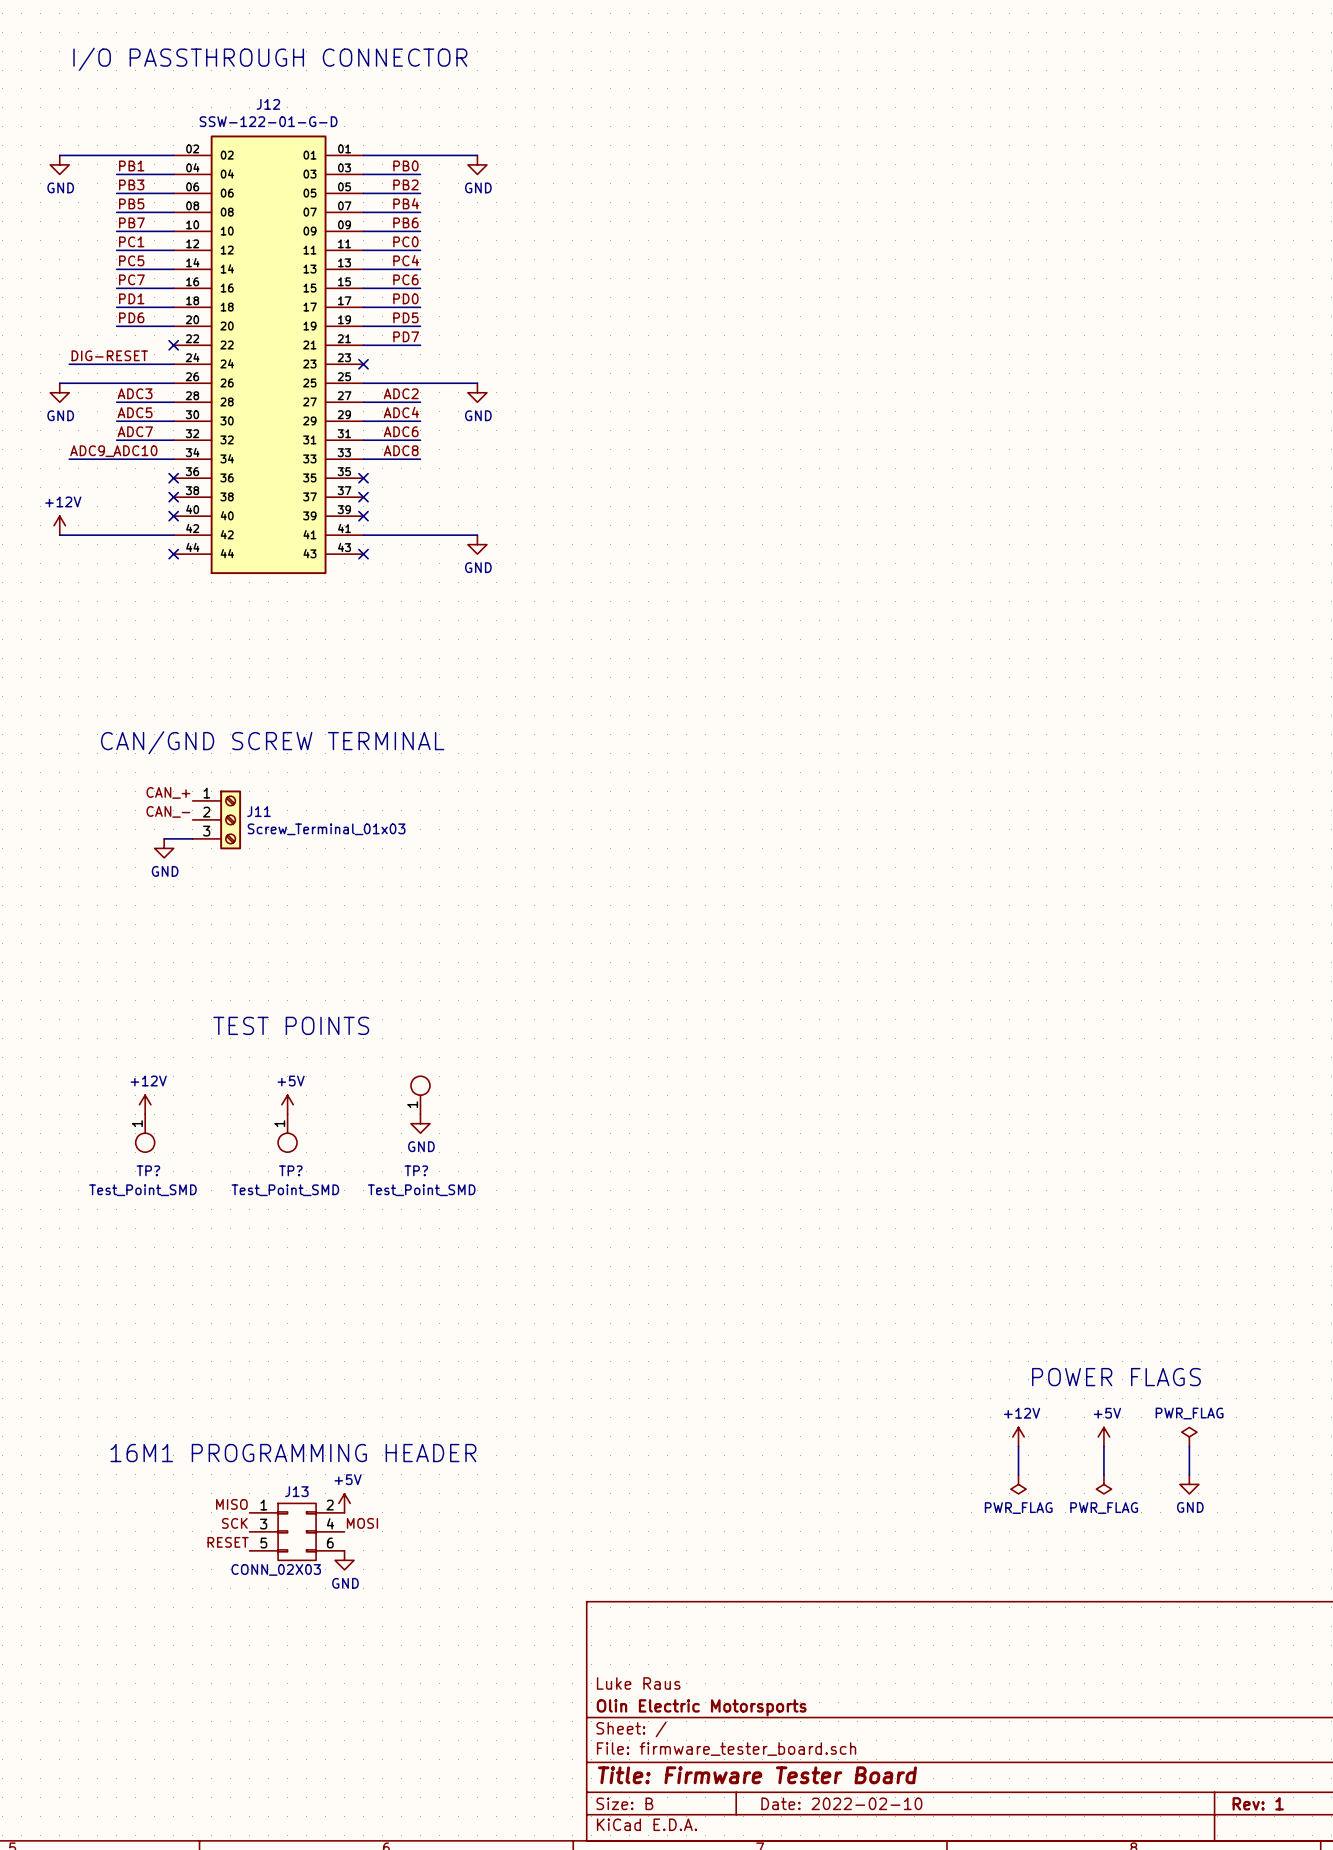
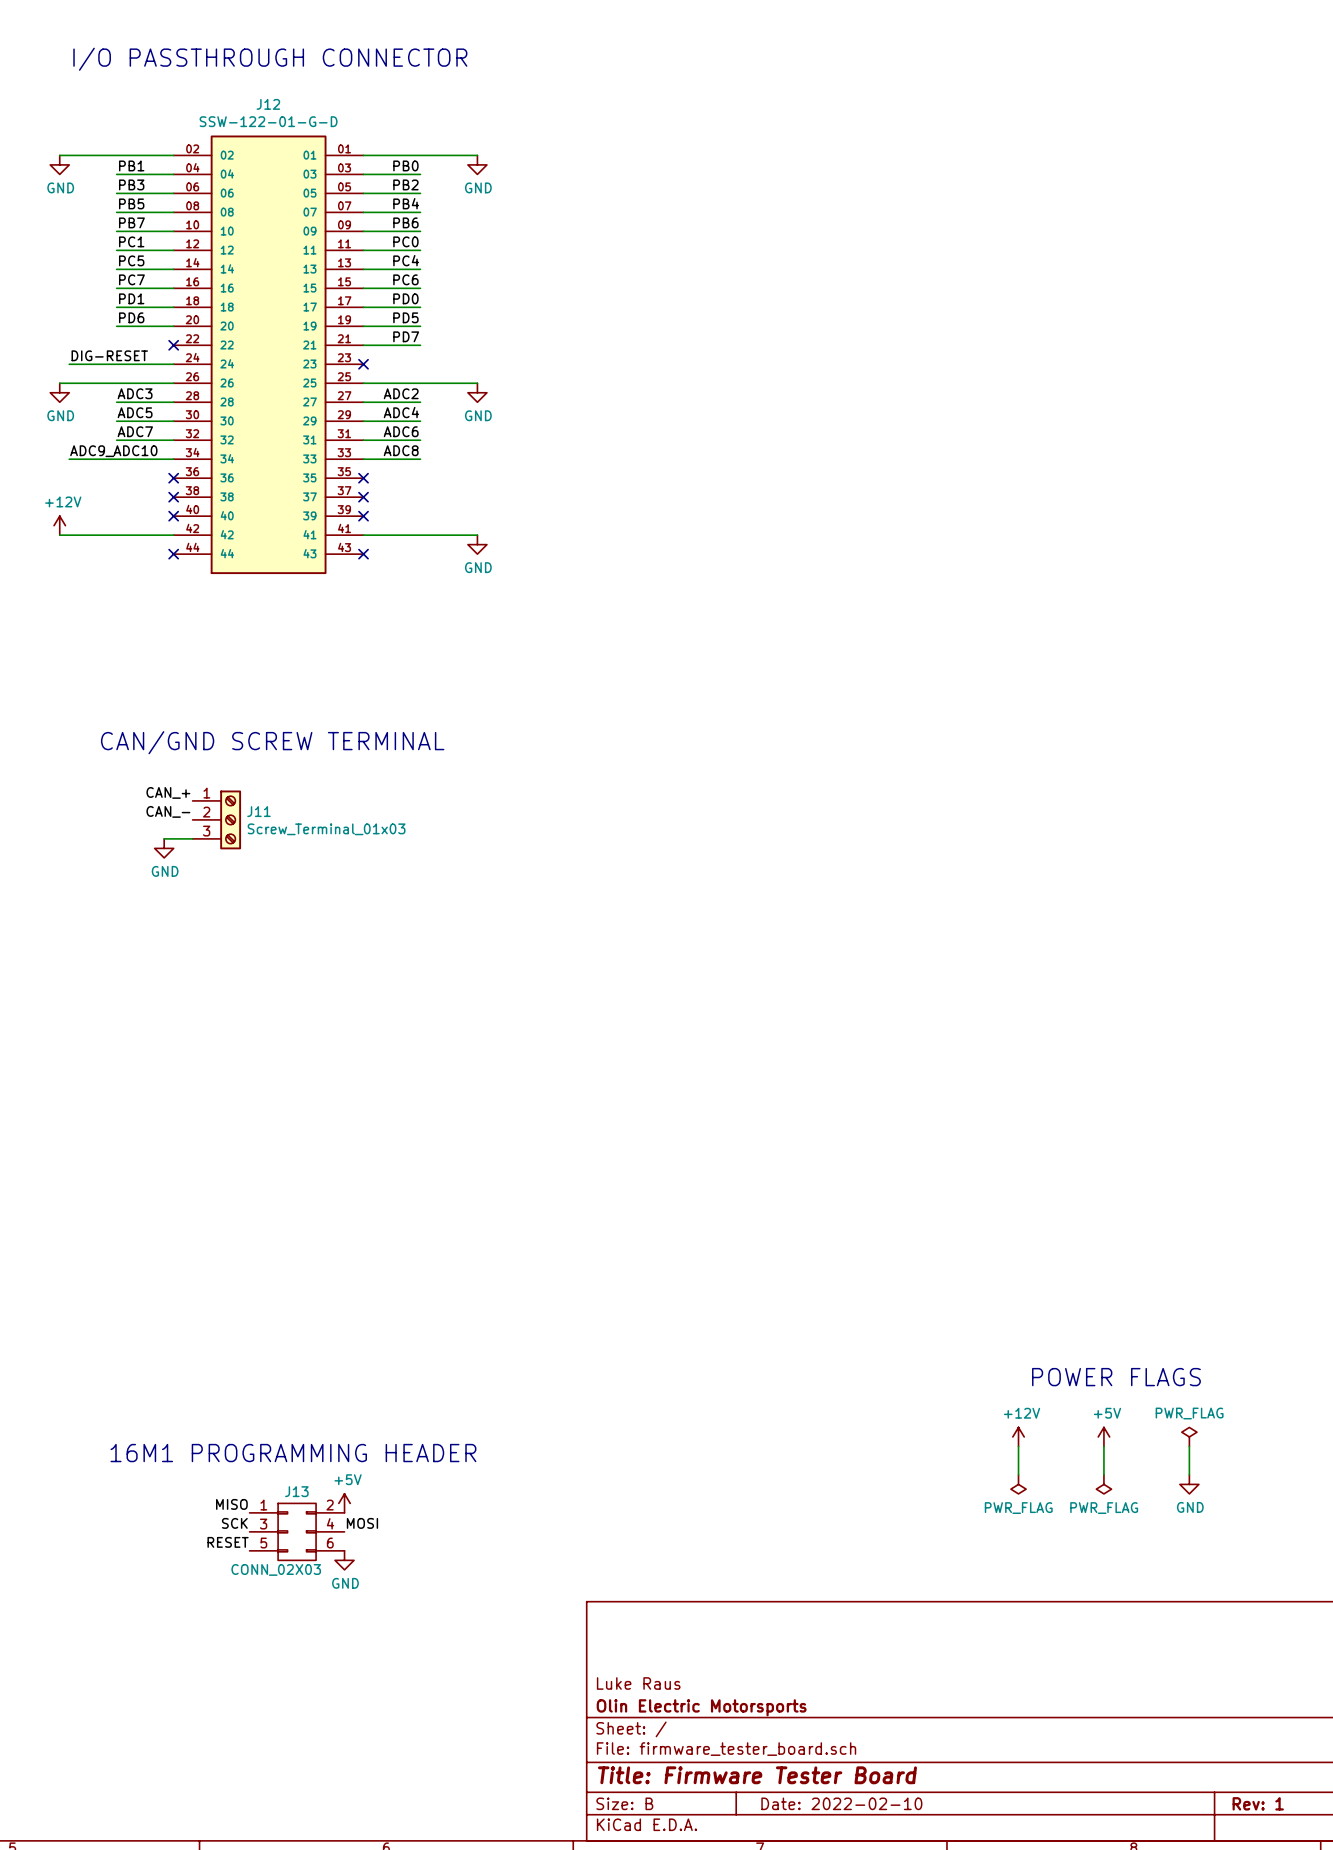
text: TEST POINTS (291, 1025) -> none
TP?: Test_Point_SMD (420, 1095) -> none
power symbol: +12V (145, 1104) -> none
power symbol: +5V (287, 1104) -> none
power symbol: GND (420, 1123) -> none
TP?: Test_Point_SMD (145, 1133) -> none
TP?: Test_Point_SMD (287, 1133) -> none

